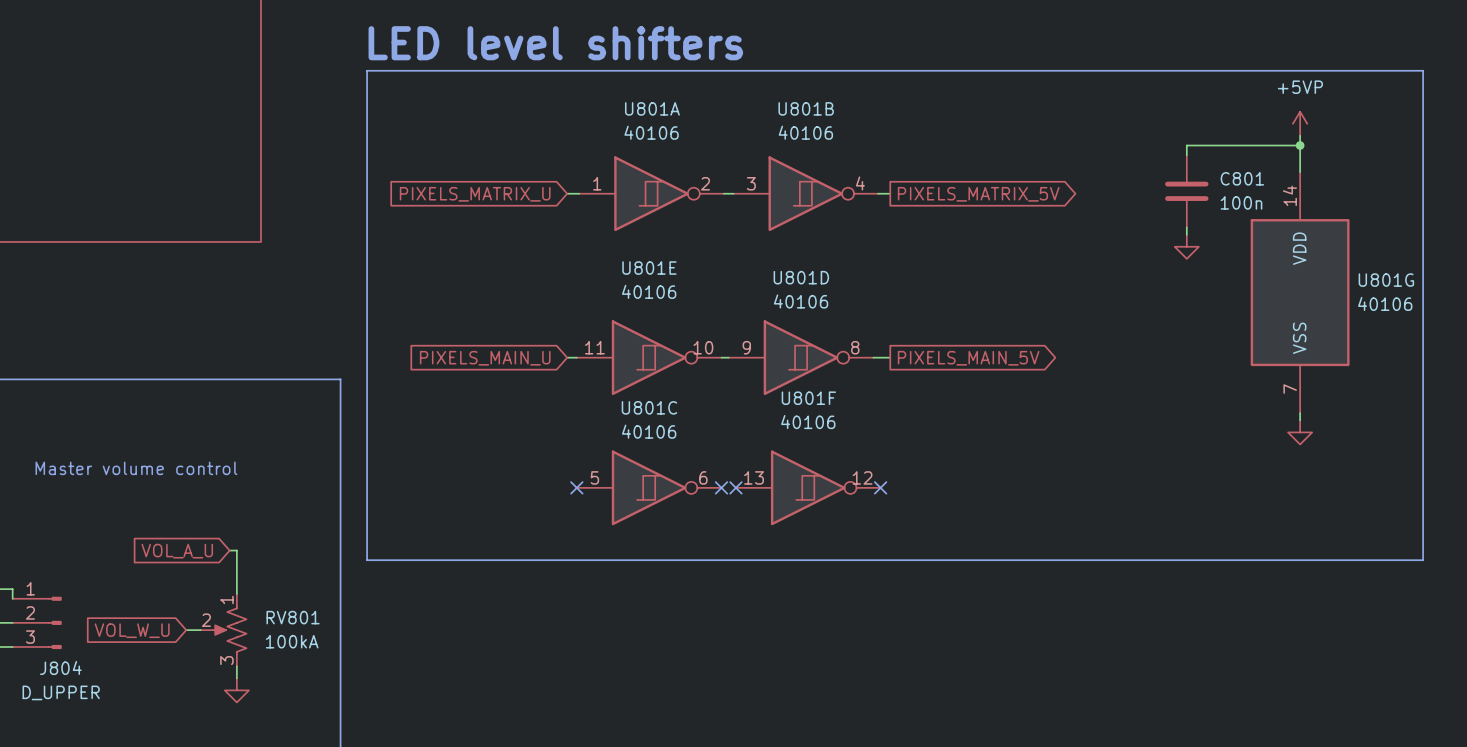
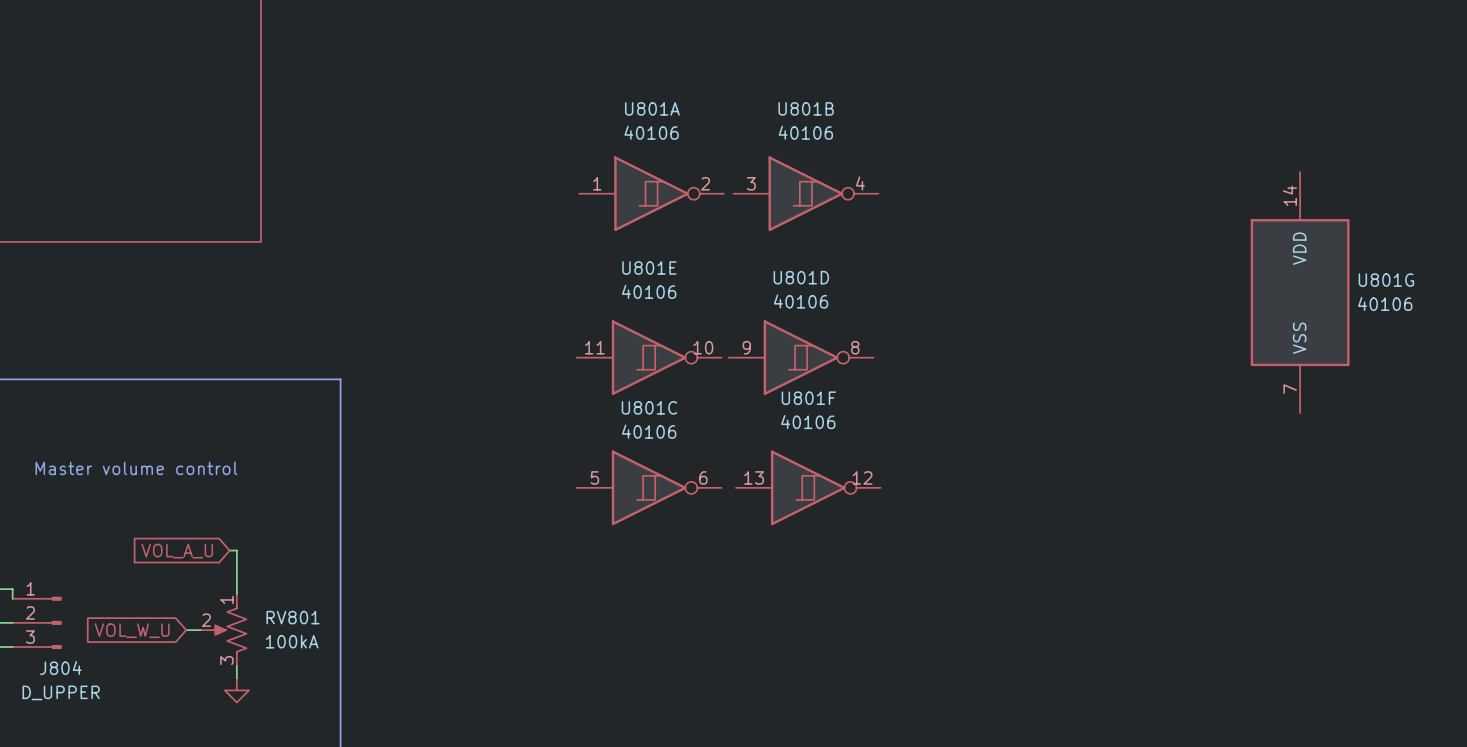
text: LED level shifters (555, 43) -> none
line: (367, 70) (1423, 70) (1423, 560) (367, 560) (367, 70) -> none
power symbol: +5VP (1300, 123) -> none
wire: (1300, 135) (1300, 172) -> none
wire: (1300, 145) (1186, 145) (1186, 155) -> none
junction: (1300, 145) -> none
C801: 100n (1186, 191) -> none
wire: (567, 193) (579, 193) -> none
wire: (723, 193) (733, 193) -> none
wire: (878, 193) (890, 193) -> none
global label: PIXELS_MATRIX_U (475, 194) -> none
global label: PIXELS_MATRIX_5V (978, 194) -> none
wire: (1186, 227) (1186, 234) -> none
power symbol: (1186, 246) -> none
wire: (567, 357) (576, 357) -> none
wire: (721, 357) (728, 357) -> none
wire: (873, 357) (890, 357) -> none
global label: PIXELS_MAIN_U (485, 358) -> none
global label: PIXELS_MAIN_5V (968, 358) -> none
wire: (1300, 413) (1300, 420) -> none
power symbol: (1300, 432) -> none
no-connect mark: (576, 487) -> none
no-connect mark: (721, 487) -> none
no-connect mark: (735, 487) -> none
no-connect mark: (880, 487) -> none

